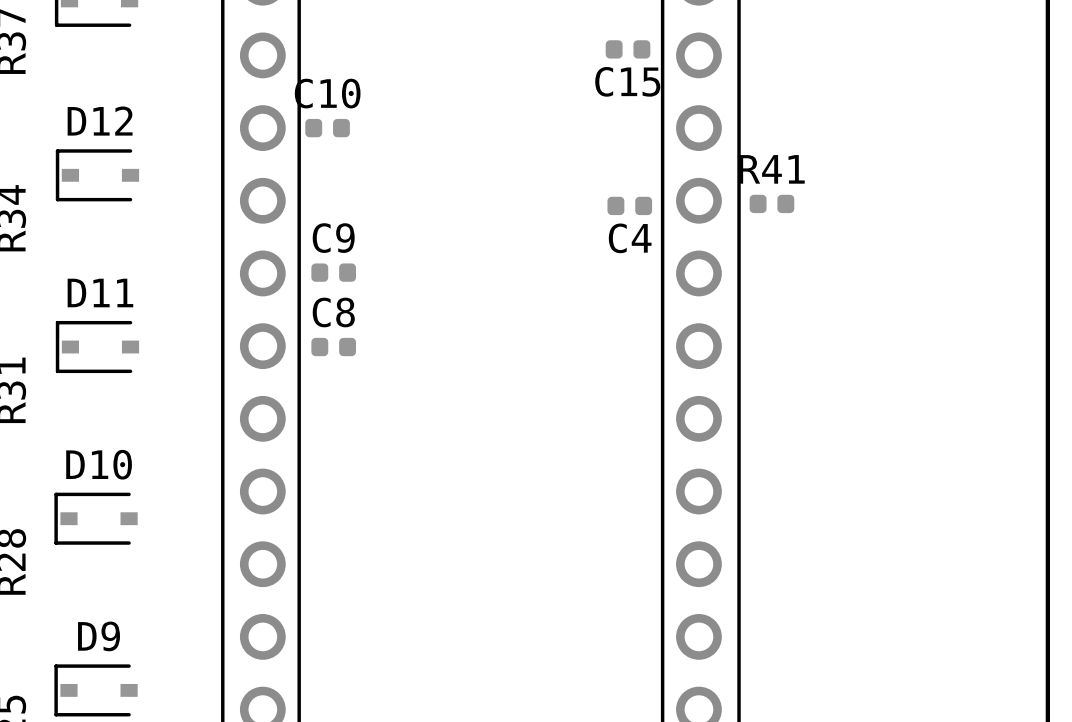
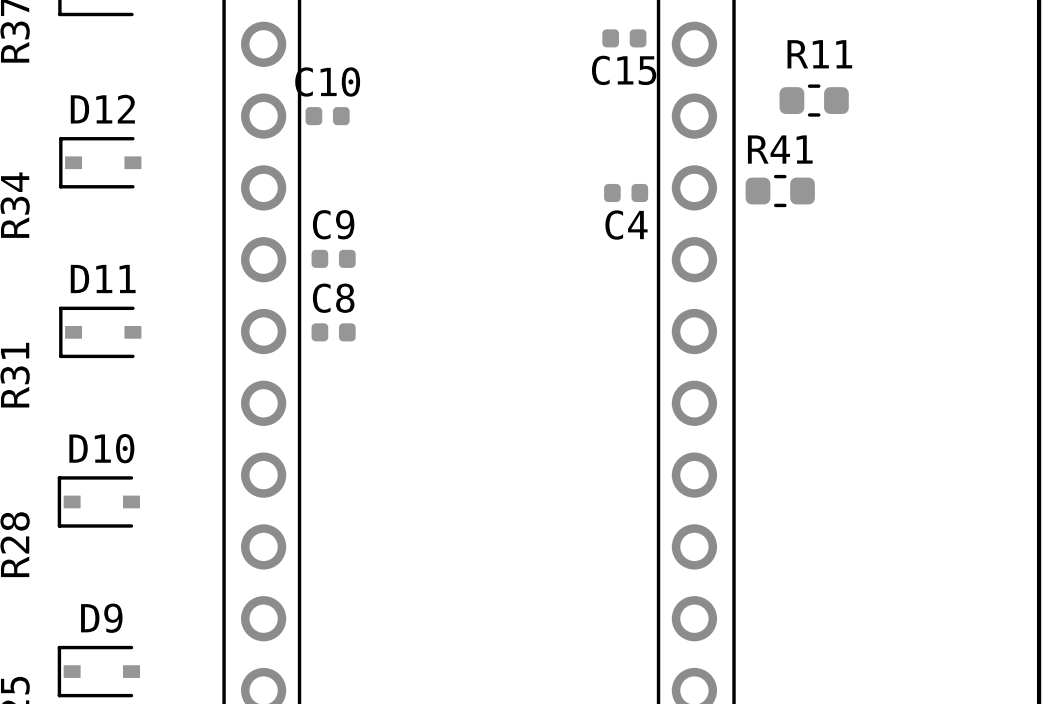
R11: none -> (814, 100)
R41 footprint: [749, 194, 795, 214] -> [745, 174, 815, 208]

